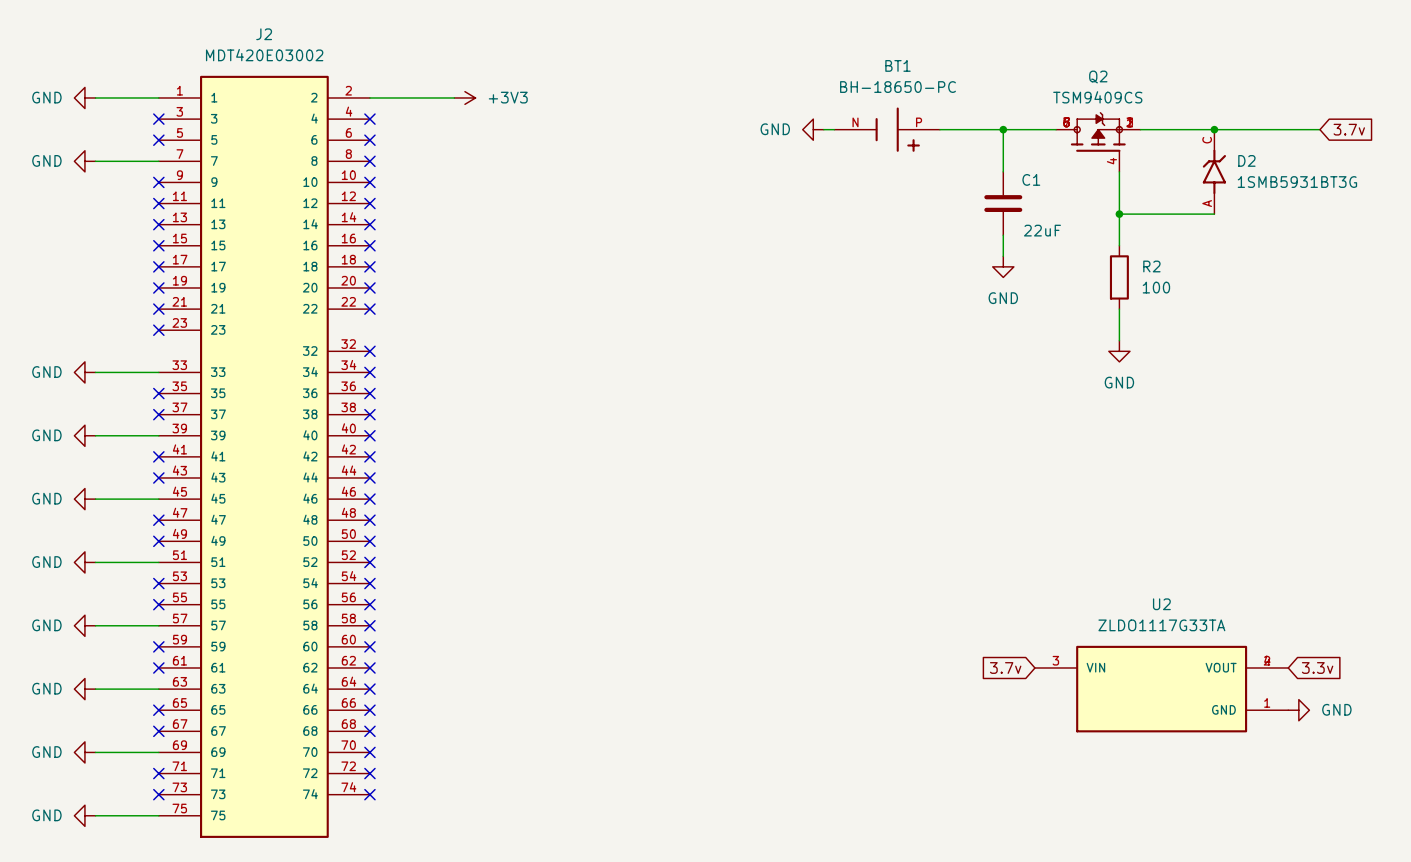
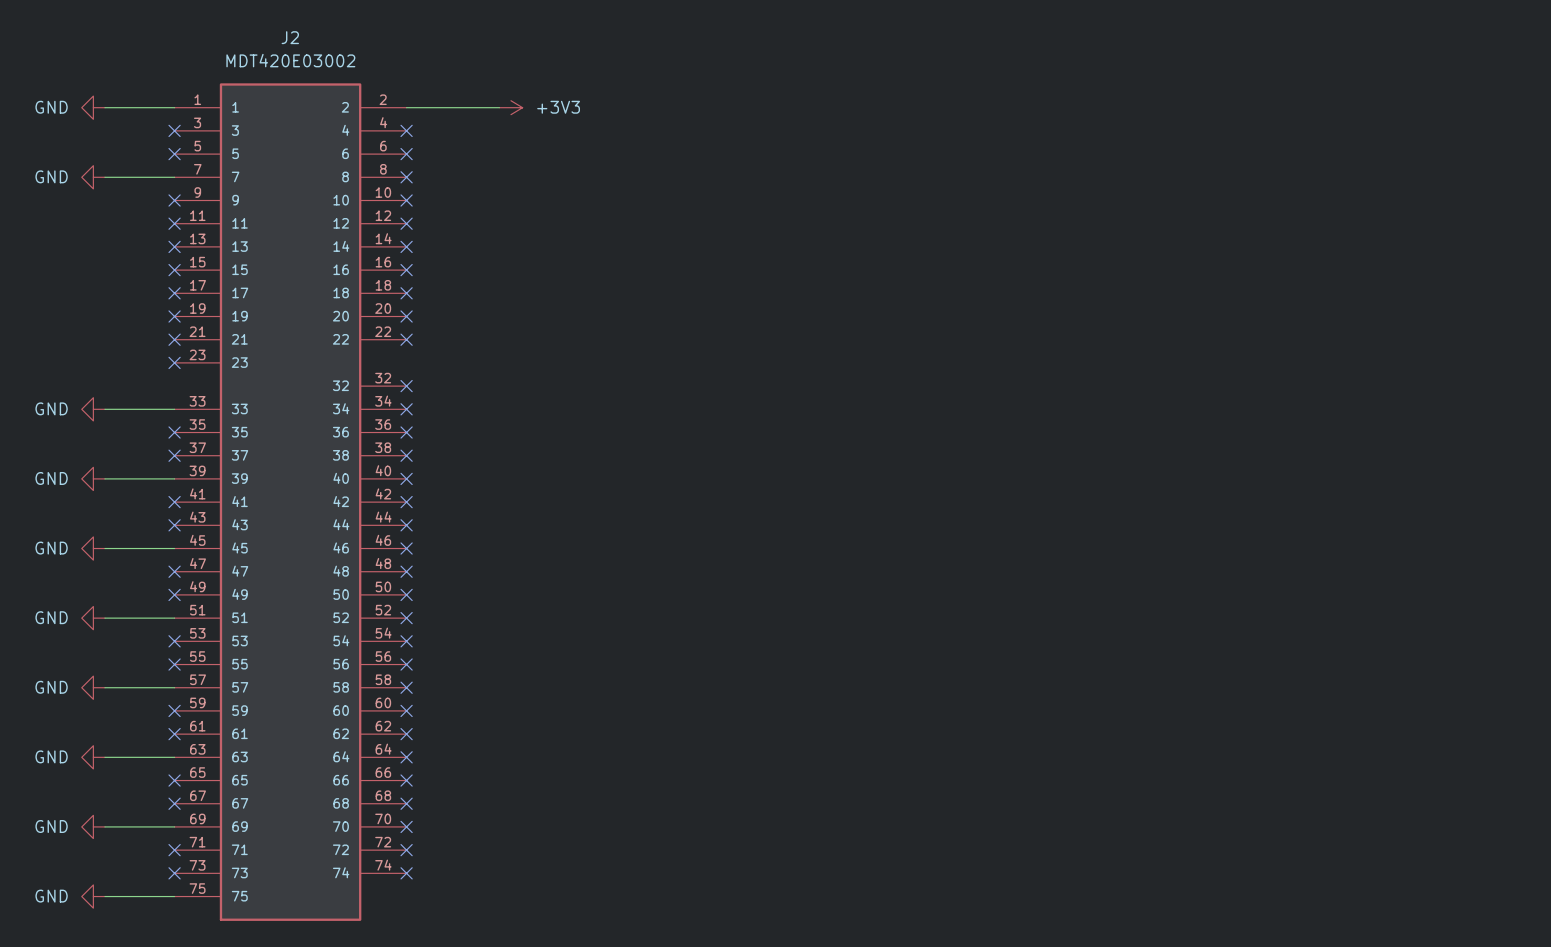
power symbol: GND (813, 129) -> none
wire: (823, 129) (834, 129) -> none
BT1: BH-18650-PC (887, 129) -> none
wire: (939, 129) (1056, 129) -> none
wire: (1003, 129) (1003, 171) -> none
junction: (1003, 129) -> none
wire: (1140, 129) (1319, 129) -> none
junction: (1214, 129) -> none
global label: 3.7v (1349, 129) -> none
Q2: TSM9409CS (1098, 142) -> none
wire: (1119, 171) (1119, 245) -> none
D2: 1SMB5931BT3G (1214, 171) -> none
C1: 22uF (1003, 203) -> none
wire: (1119, 214) (1214, 214) -> none
junction: (1119, 214) -> none
wire: (1003, 235) (1003, 256) -> none
power symbol: GND (1003, 266) -> none
R2: 100 (1119, 277) -> none
wire: (1119, 309) (1119, 340) -> none
power symbol: GND (1119, 351) -> none
global label: 3.7v (1005, 667) -> none
global label: 3.3v (1317, 667) -> none
U2: ZLDO1117G33TA (1161, 689) -> none
power symbol: GND (1298, 710) -> none

